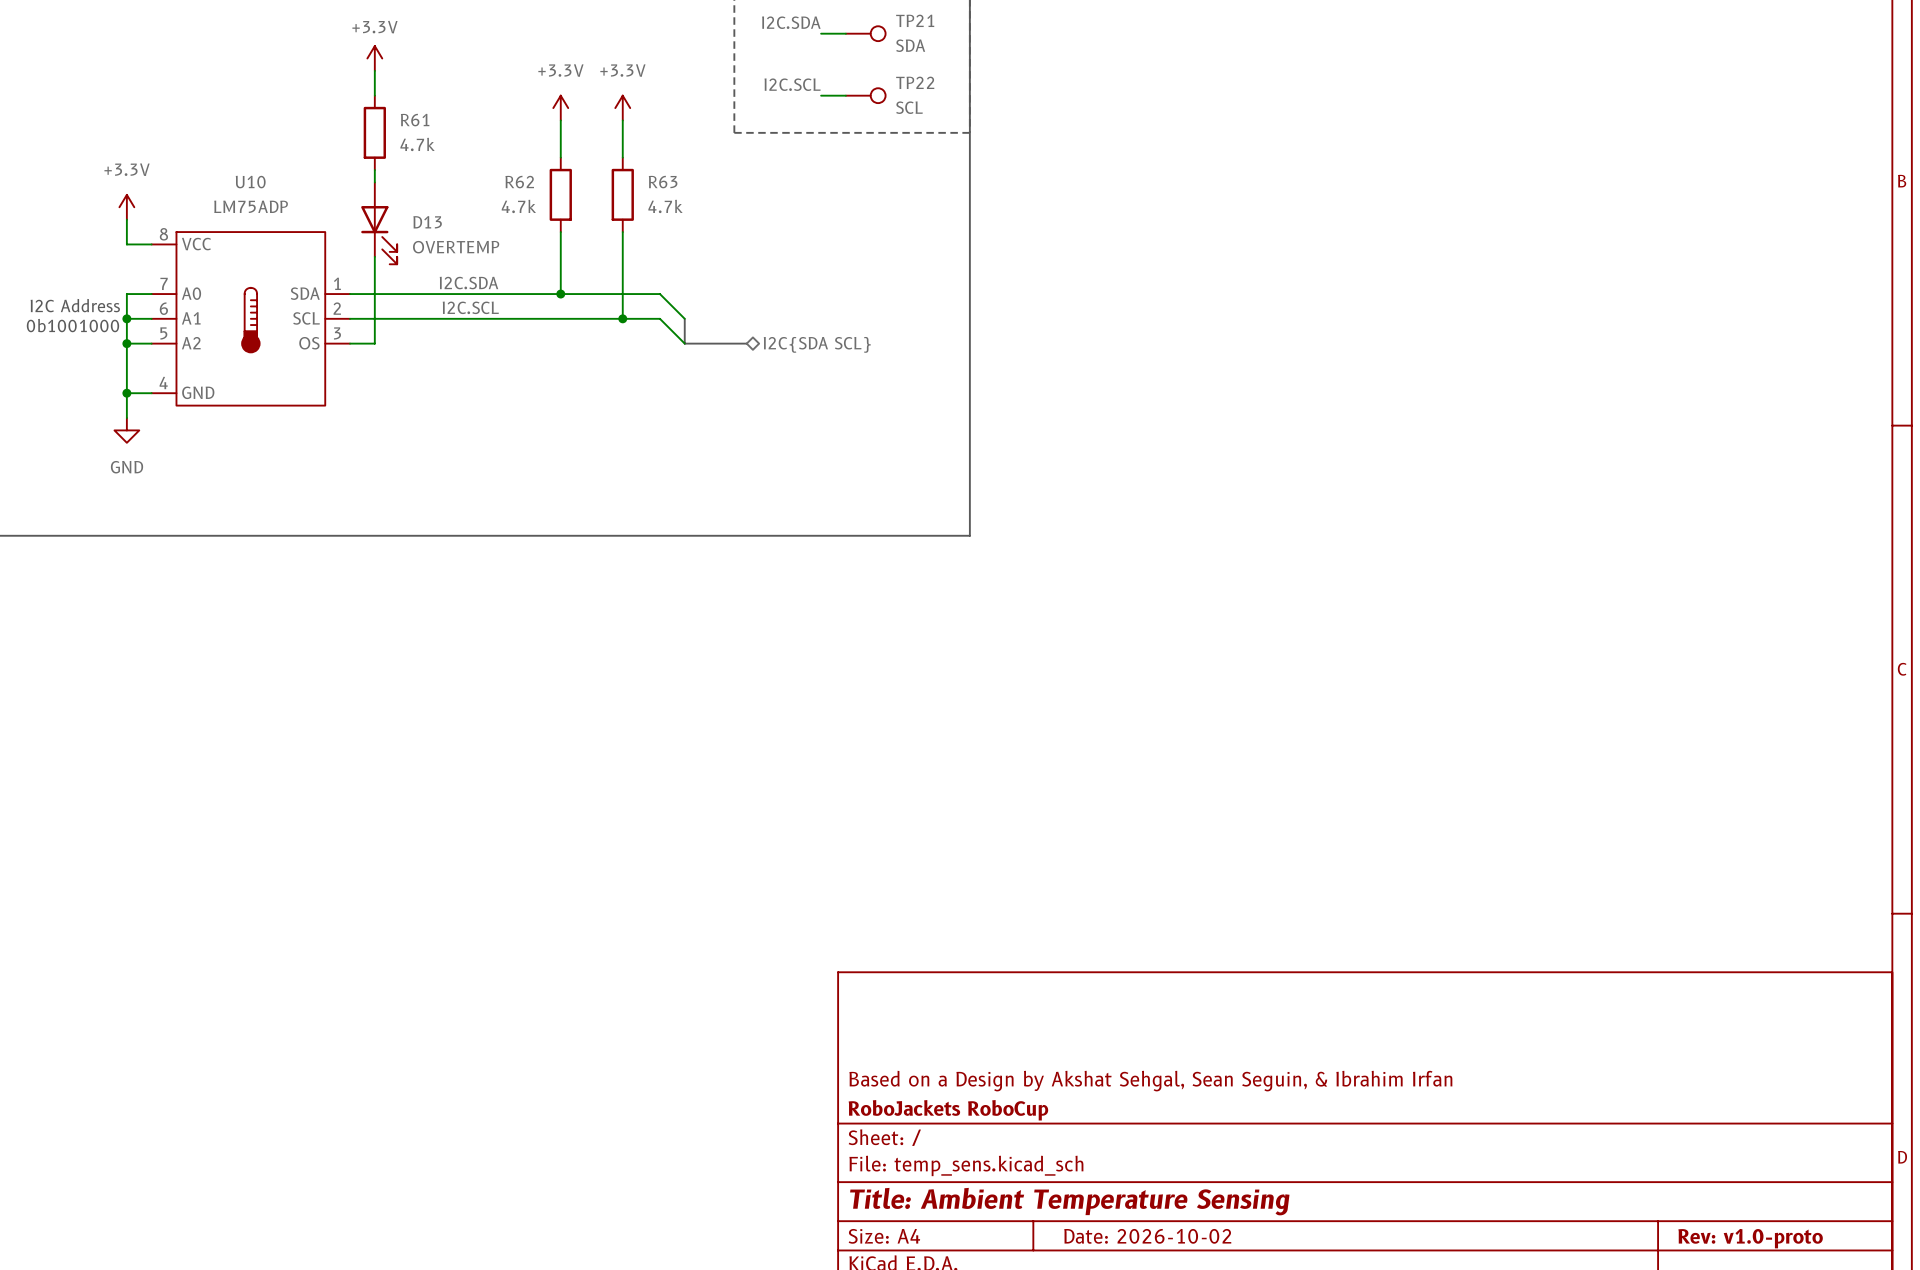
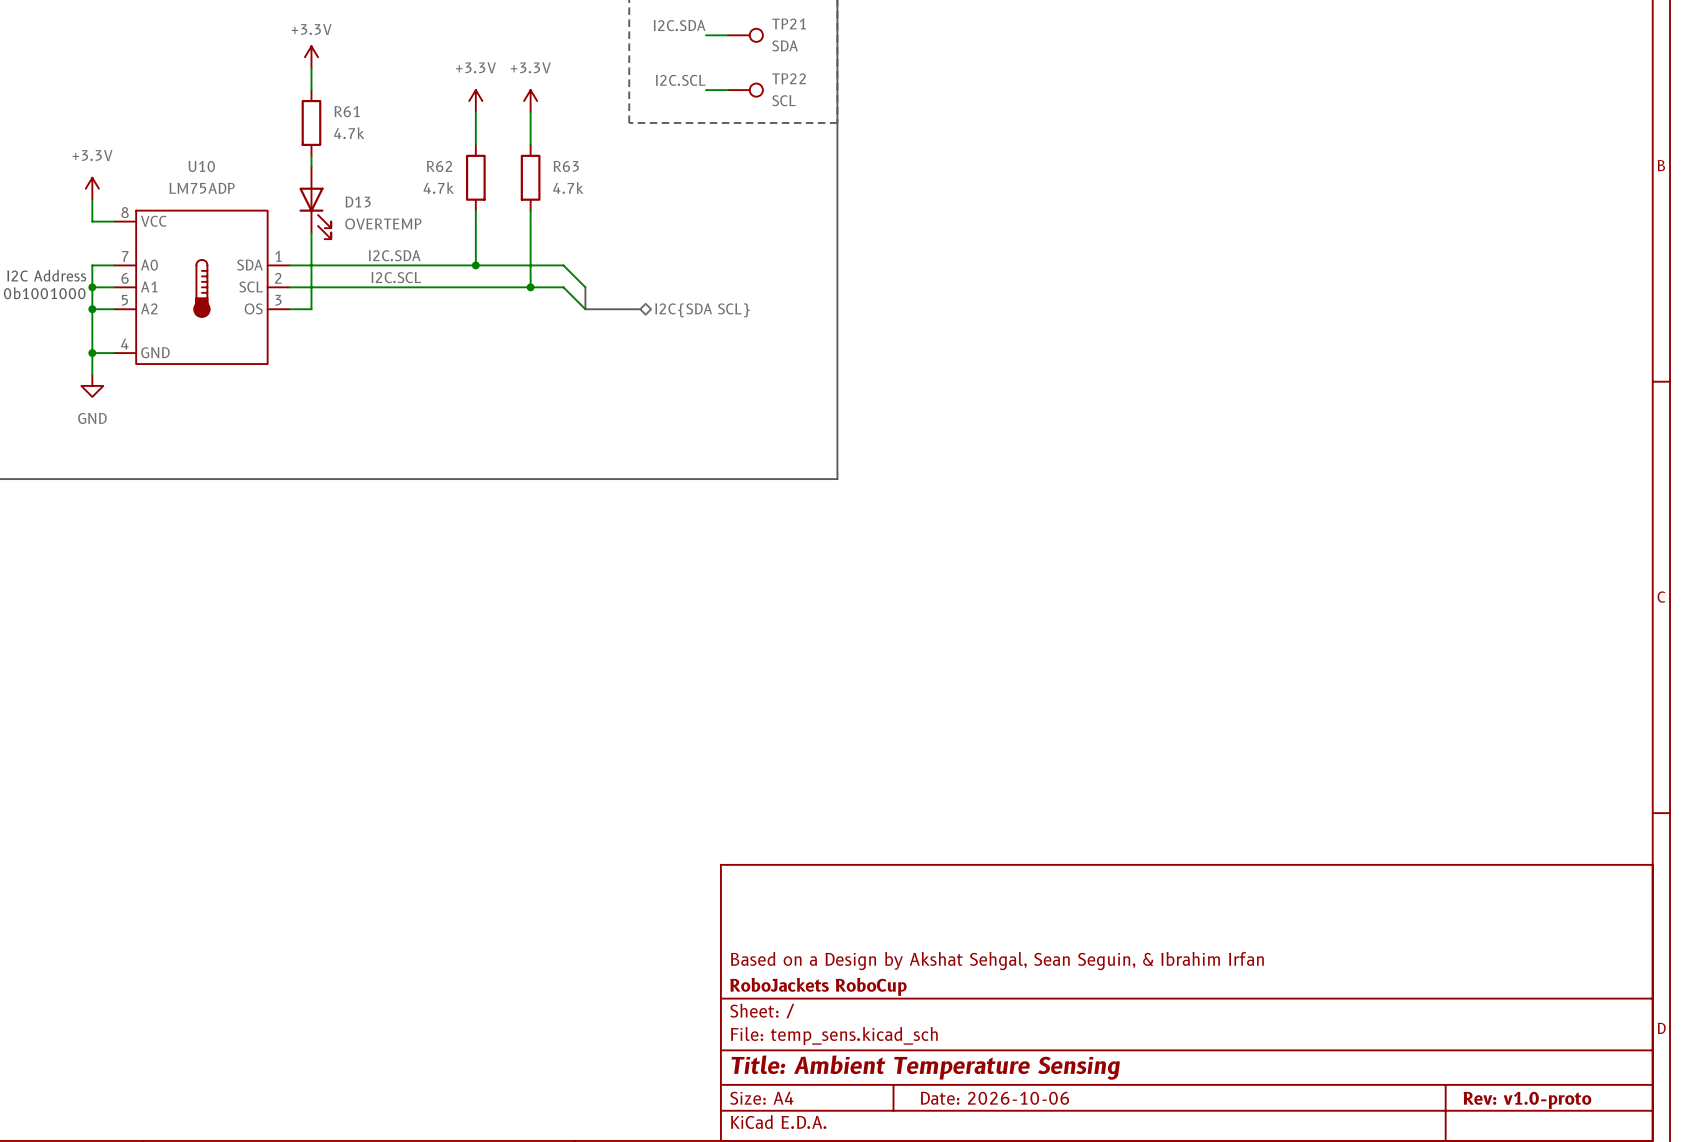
title block: Date: 2026-10-02 (1147, 1236) -> Date: 2026-10-06 (994, 1098)

